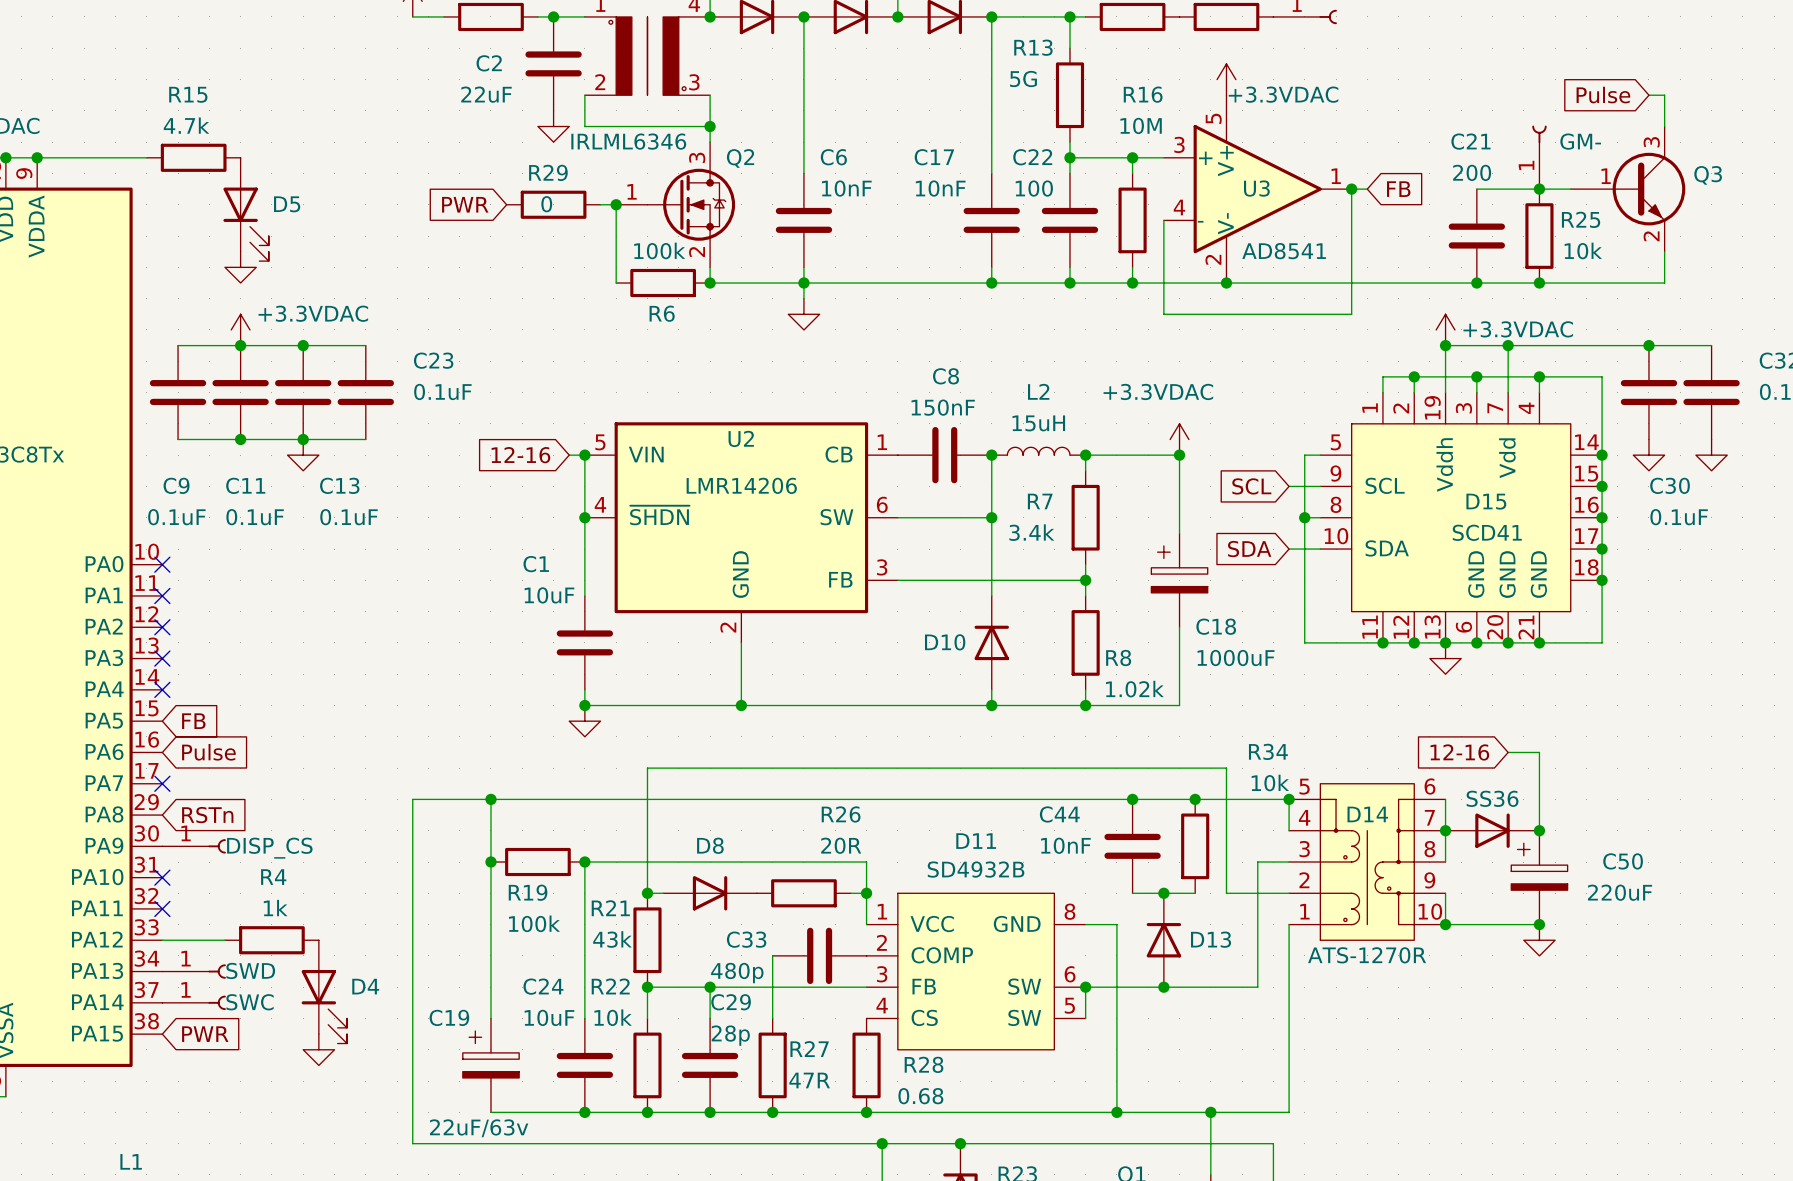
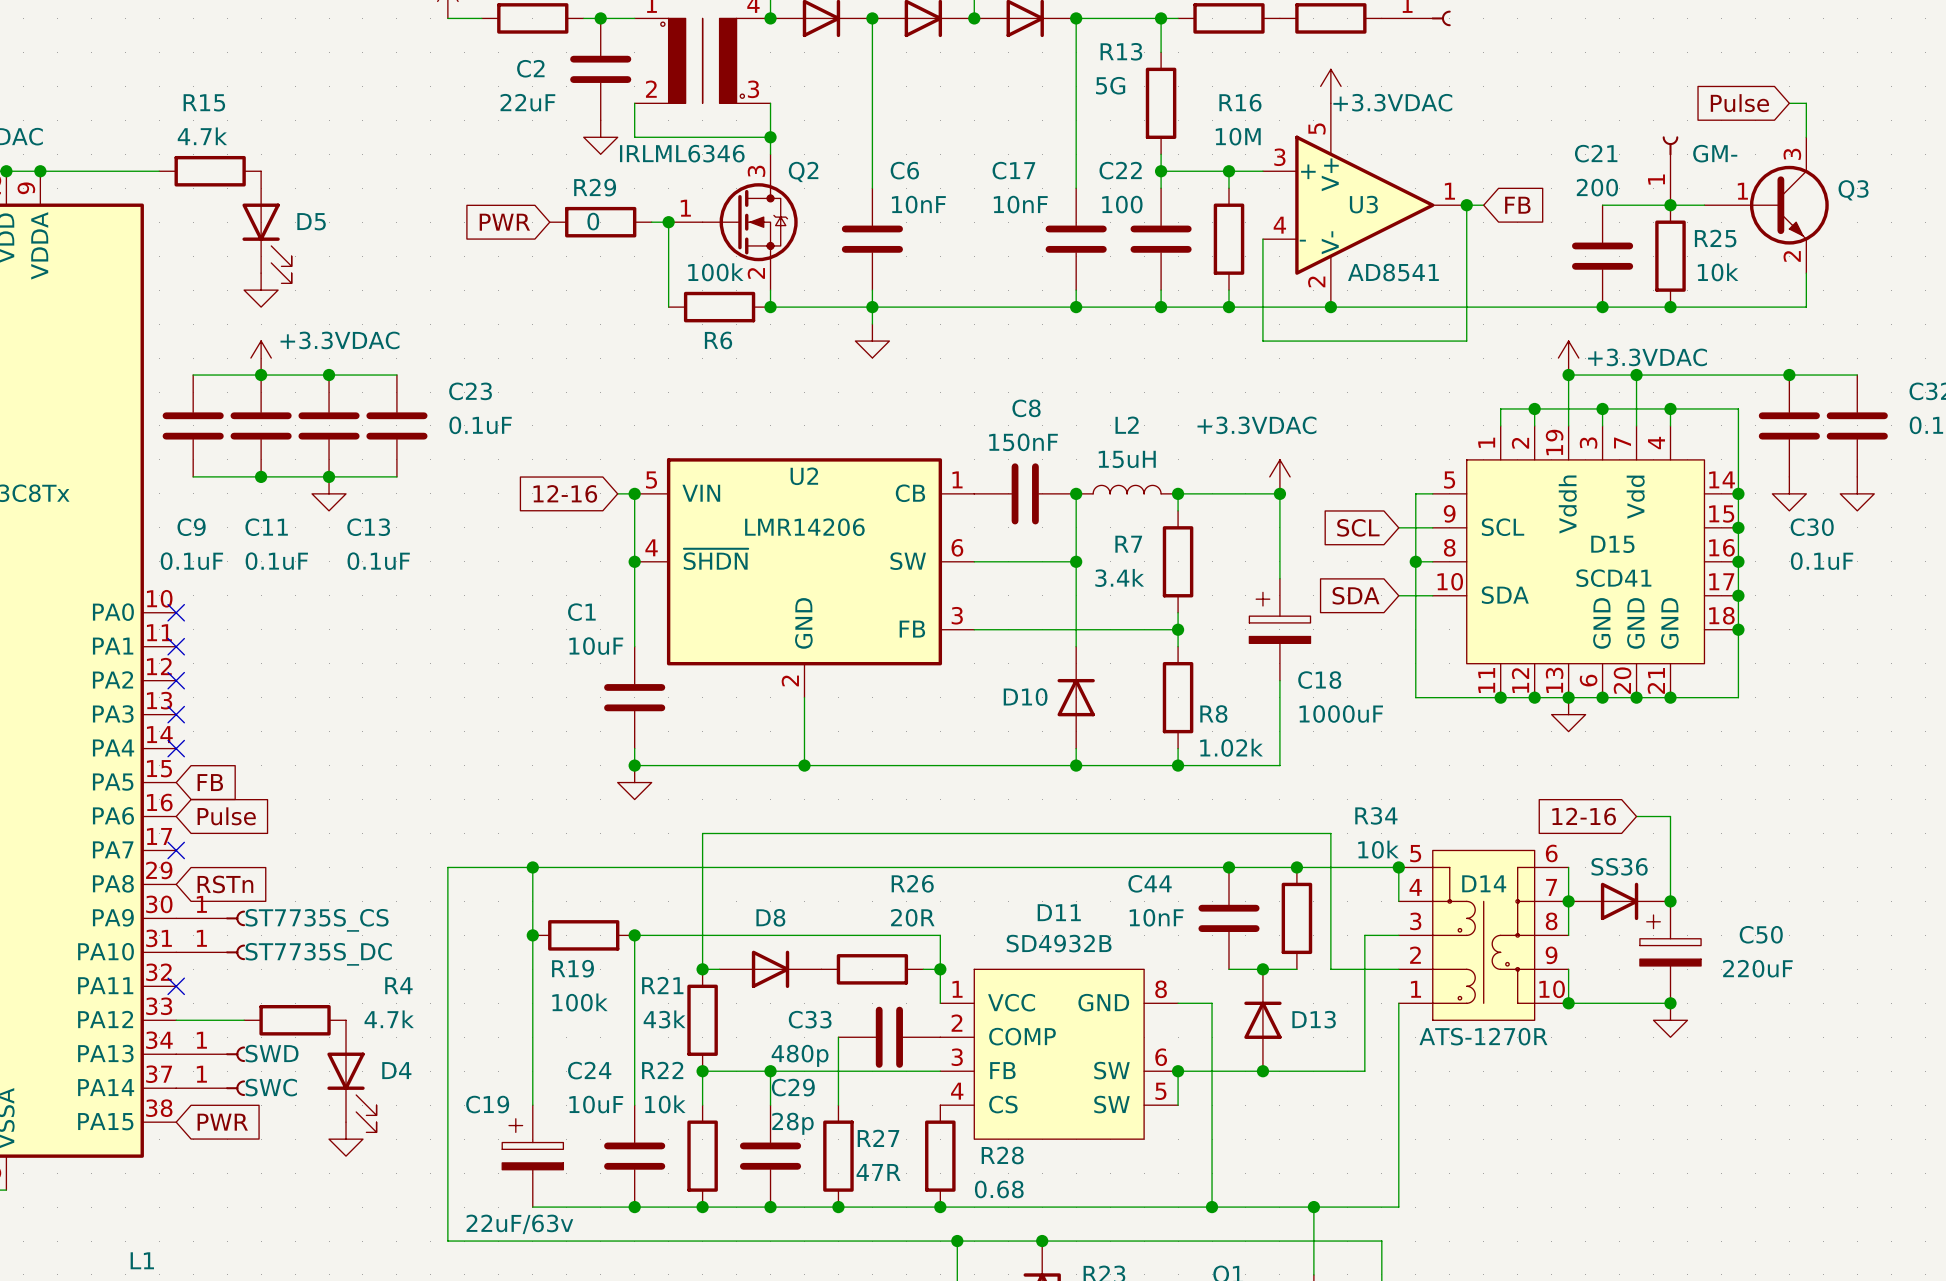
part value: DISP_CS (269, 848) -> ST7735S_CS (317, 920)
no-connect mark: (162, 877) -> none
part: none -> ST7735S_DC (210, 952)
R4 name position: R4 (273, 877) -> R4 (398, 985)
R4 value: 1k (275, 908) -> 4.7k (389, 1019)

